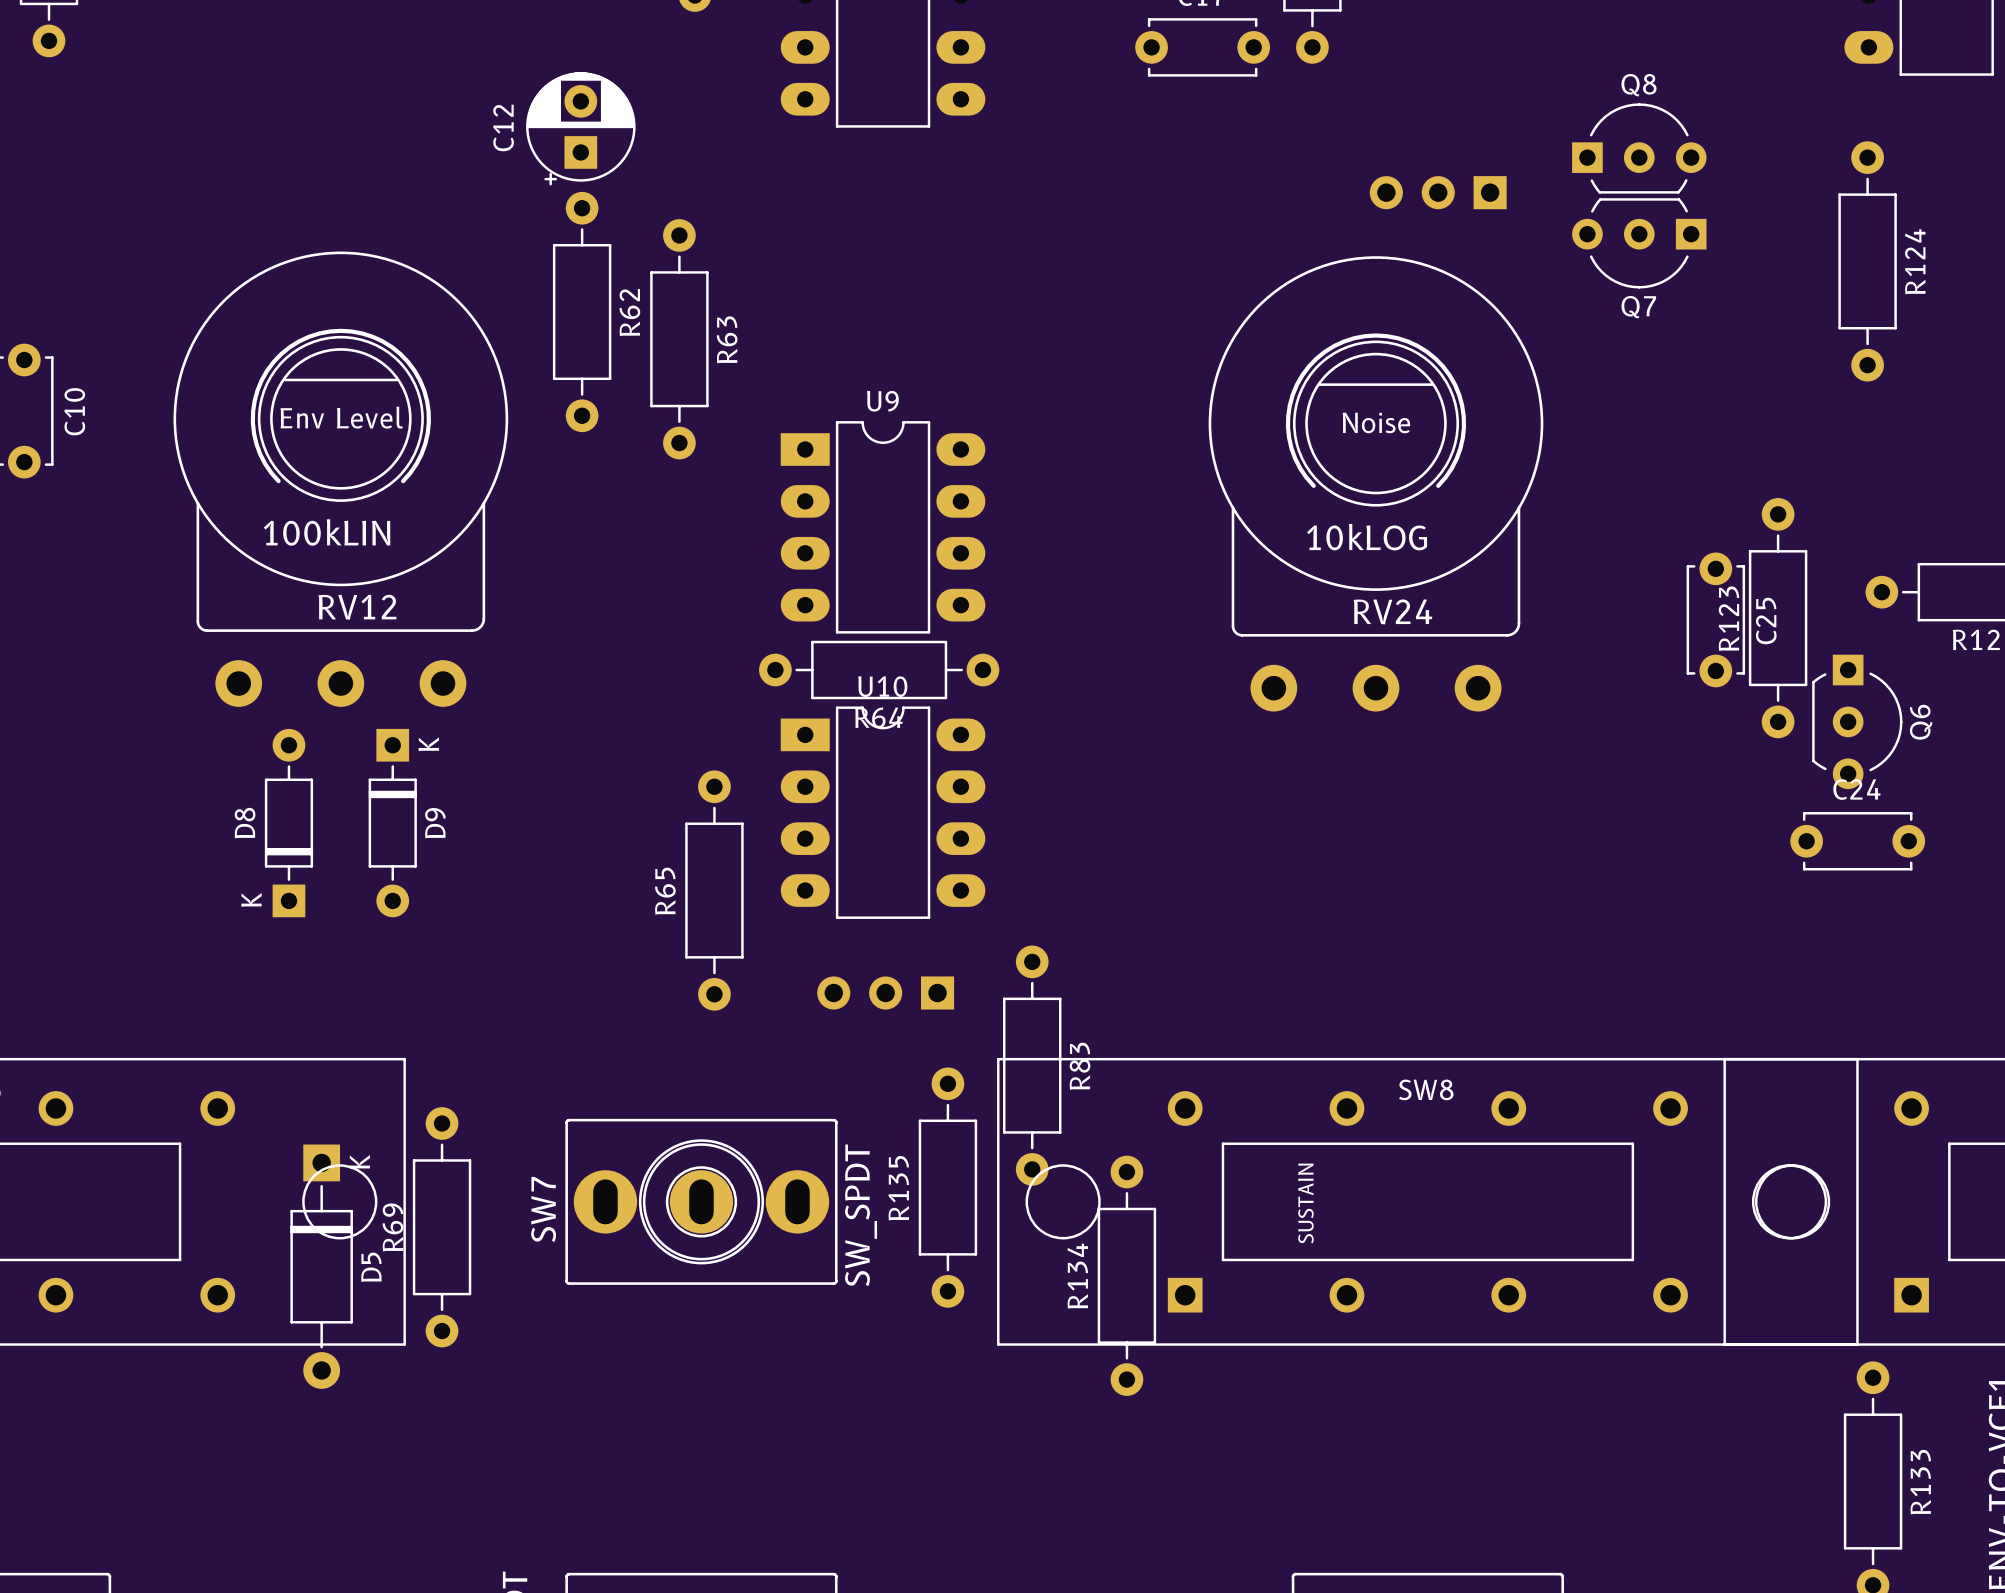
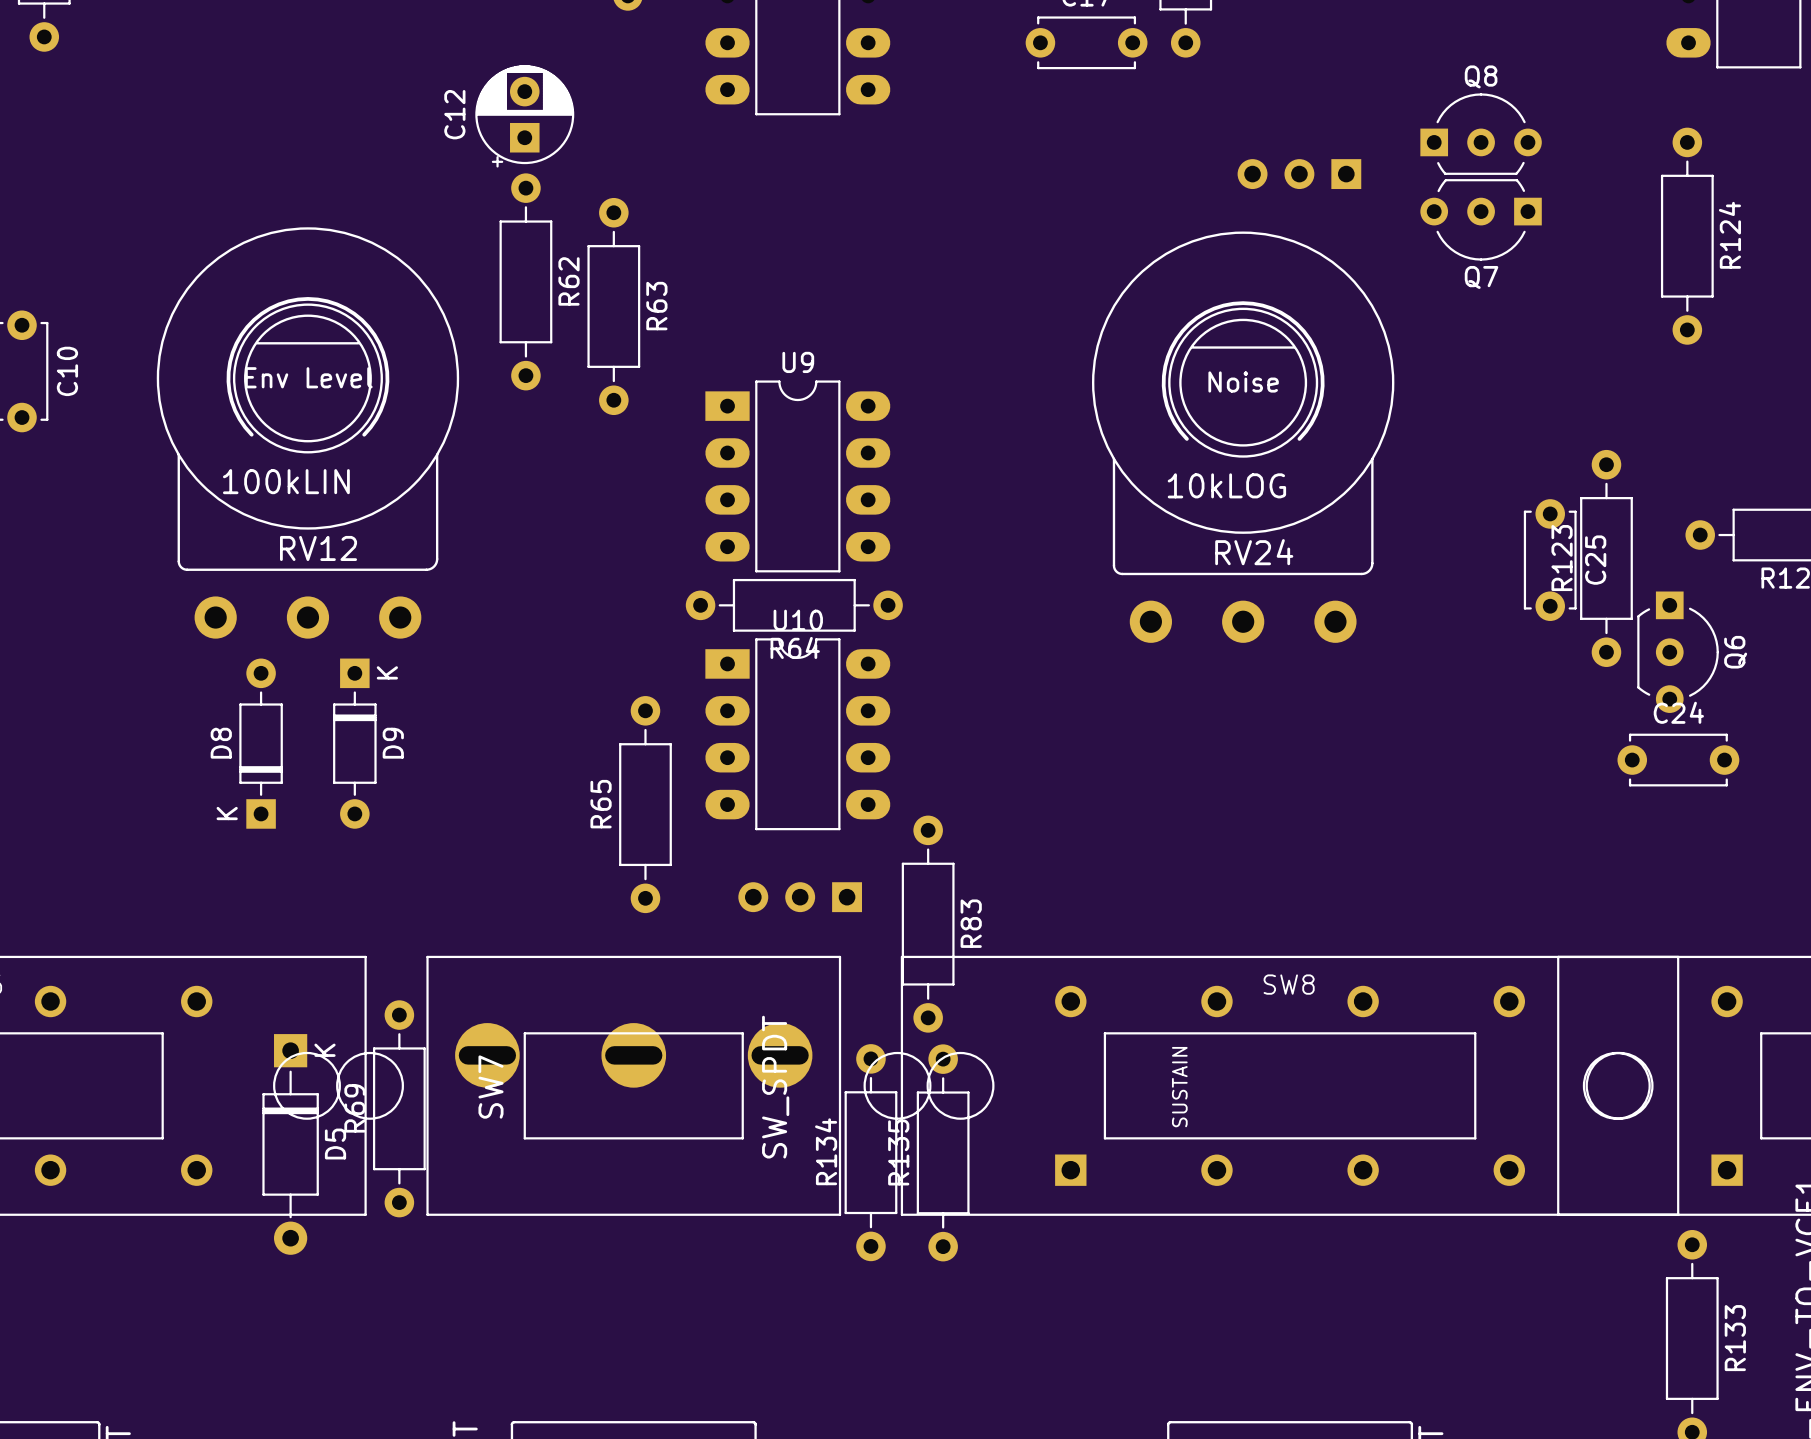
R83 position: (1032, 1065) -> (928, 924)
SW7 footprint: [565, 1118, 838, 1285] -> [336, 955, 932, 1216]
R135 position: (947, 1187) -> (943, 1152)
R134 position: (1126, 1275) -> (870, 1152)

